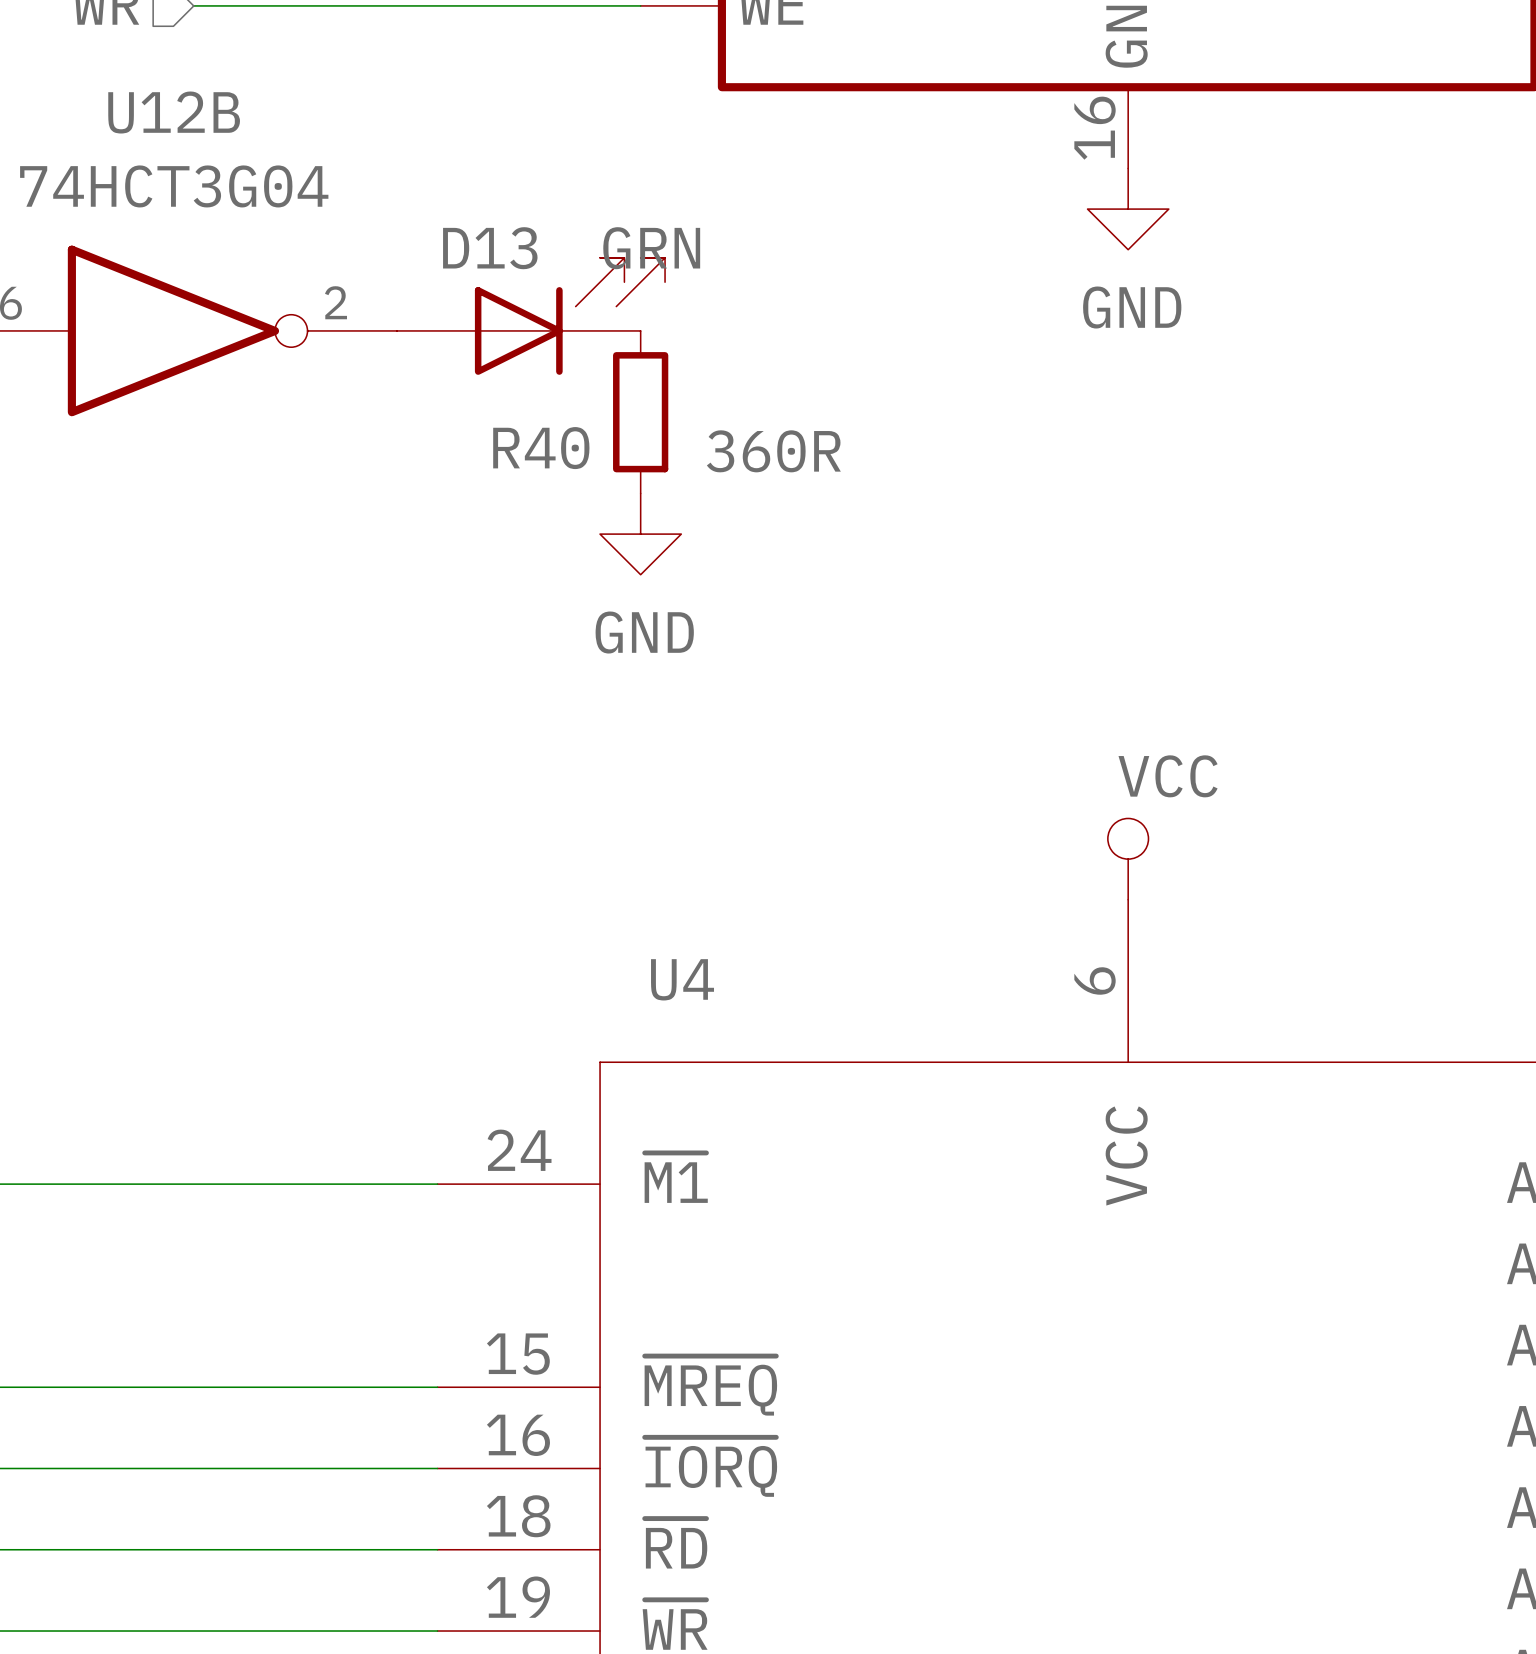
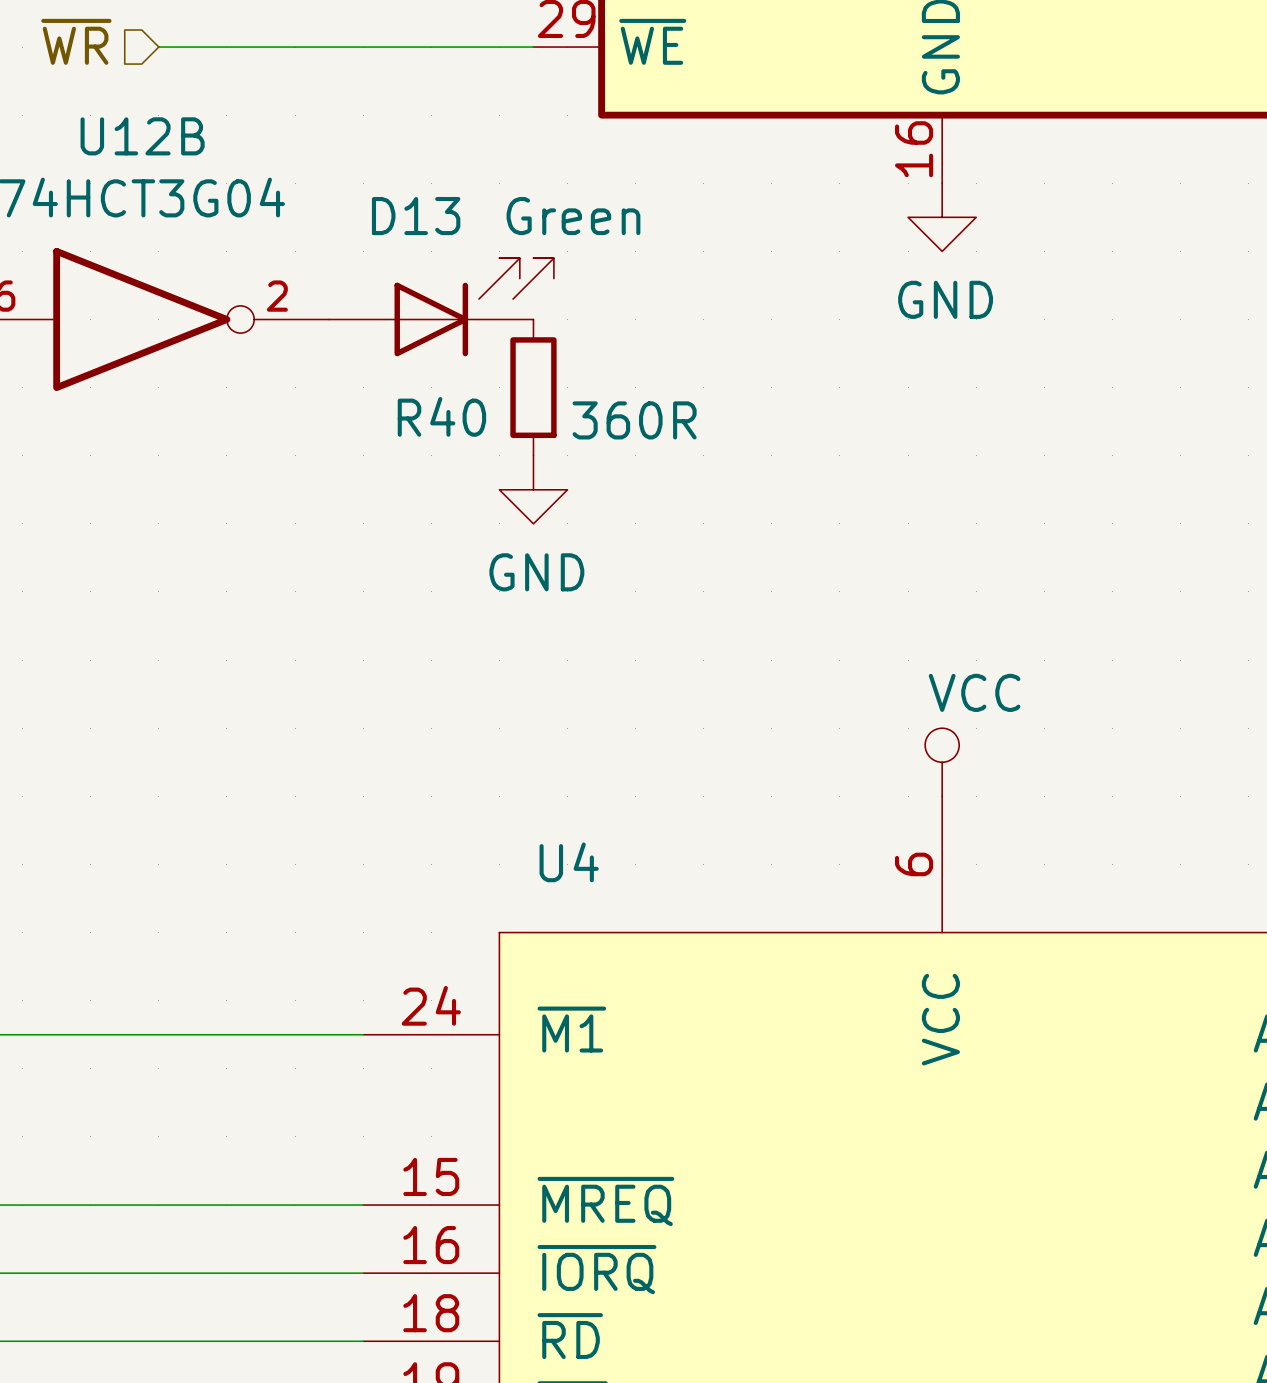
D13 name position: D13 (490, 248) -> D13 (416, 216)
D13 value: GRN (651, 248) -> Green (573, 216)

